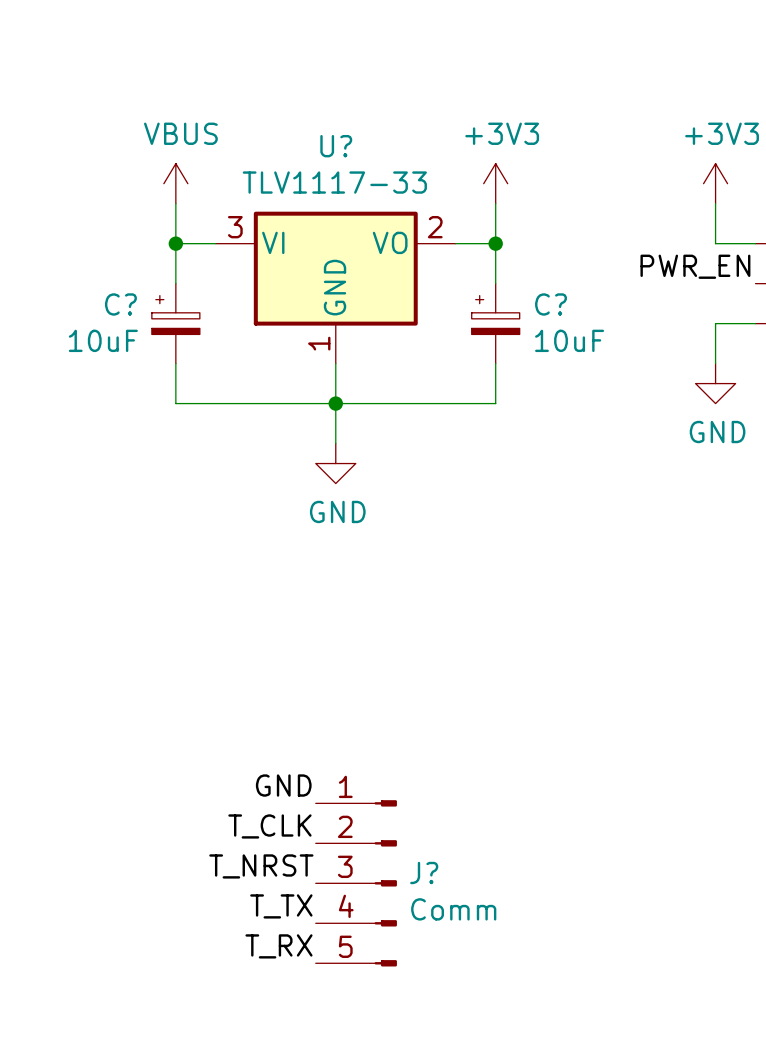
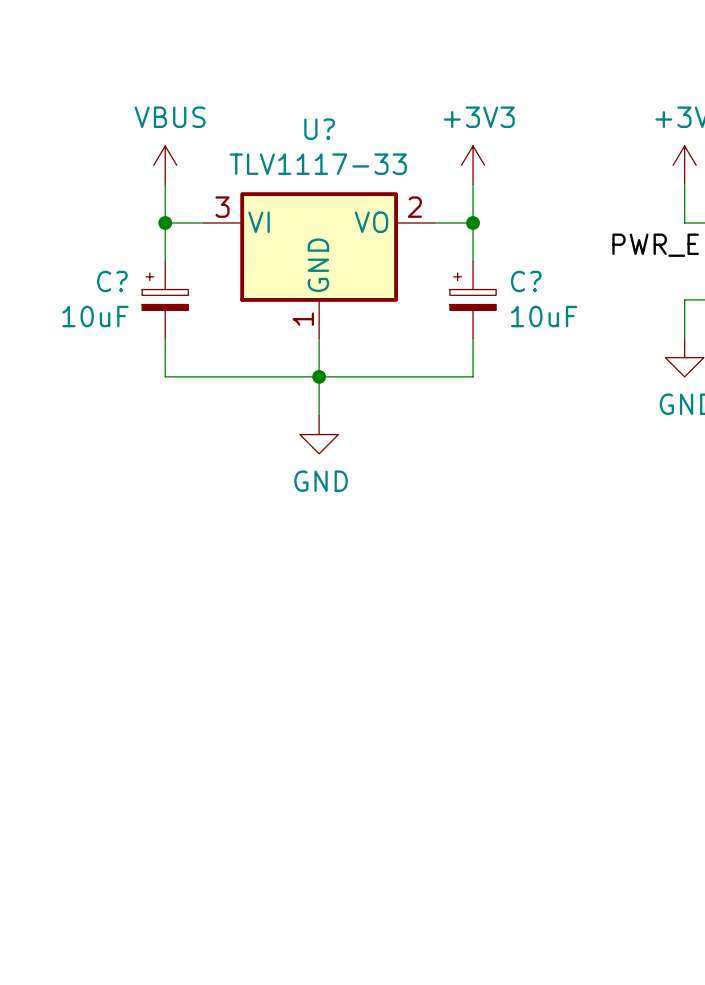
label: GND (283, 785) -> none
label: T_CLK (269, 826) -> none
label: T_NRST (261, 866) -> none
J?: Comm (356, 883) -> none
label: T_TX (281, 906) -> none
label: T_RX (278, 946) -> none

